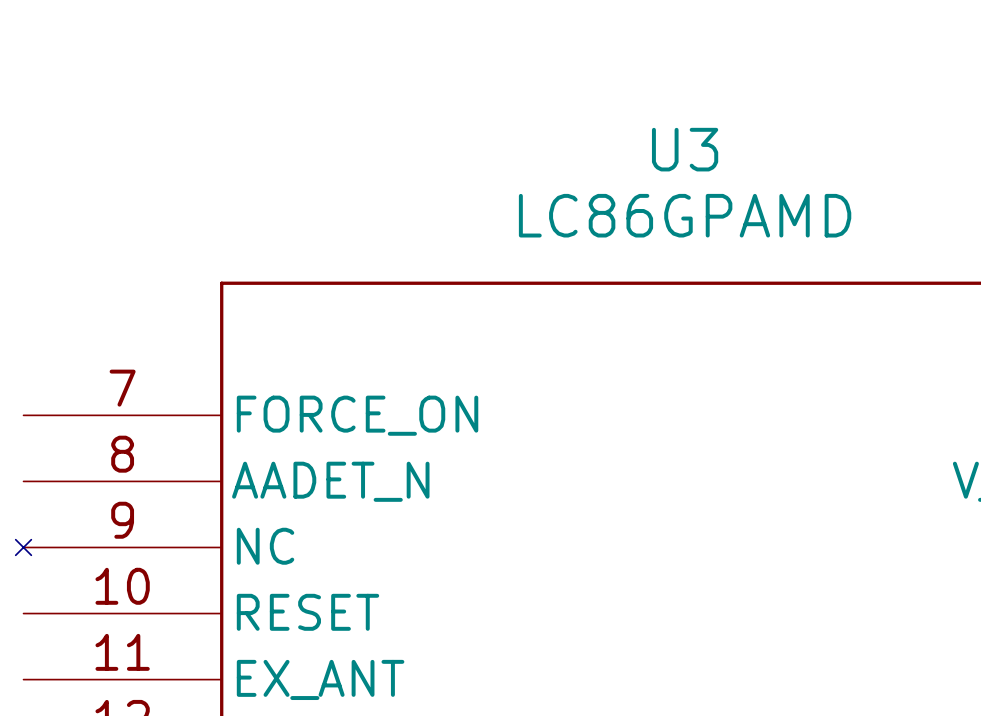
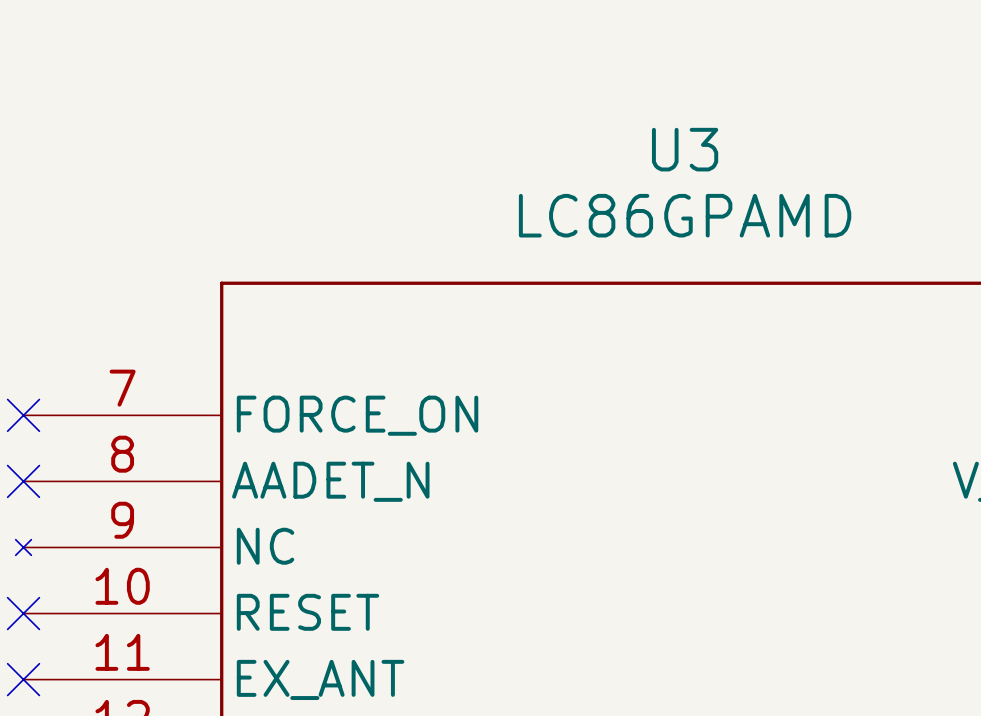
no-connect mark: none -> (23, 415)
no-connect mark: none -> (23, 481)
no-connect mark: none -> (23, 613)
no-connect mark: none -> (23, 679)

